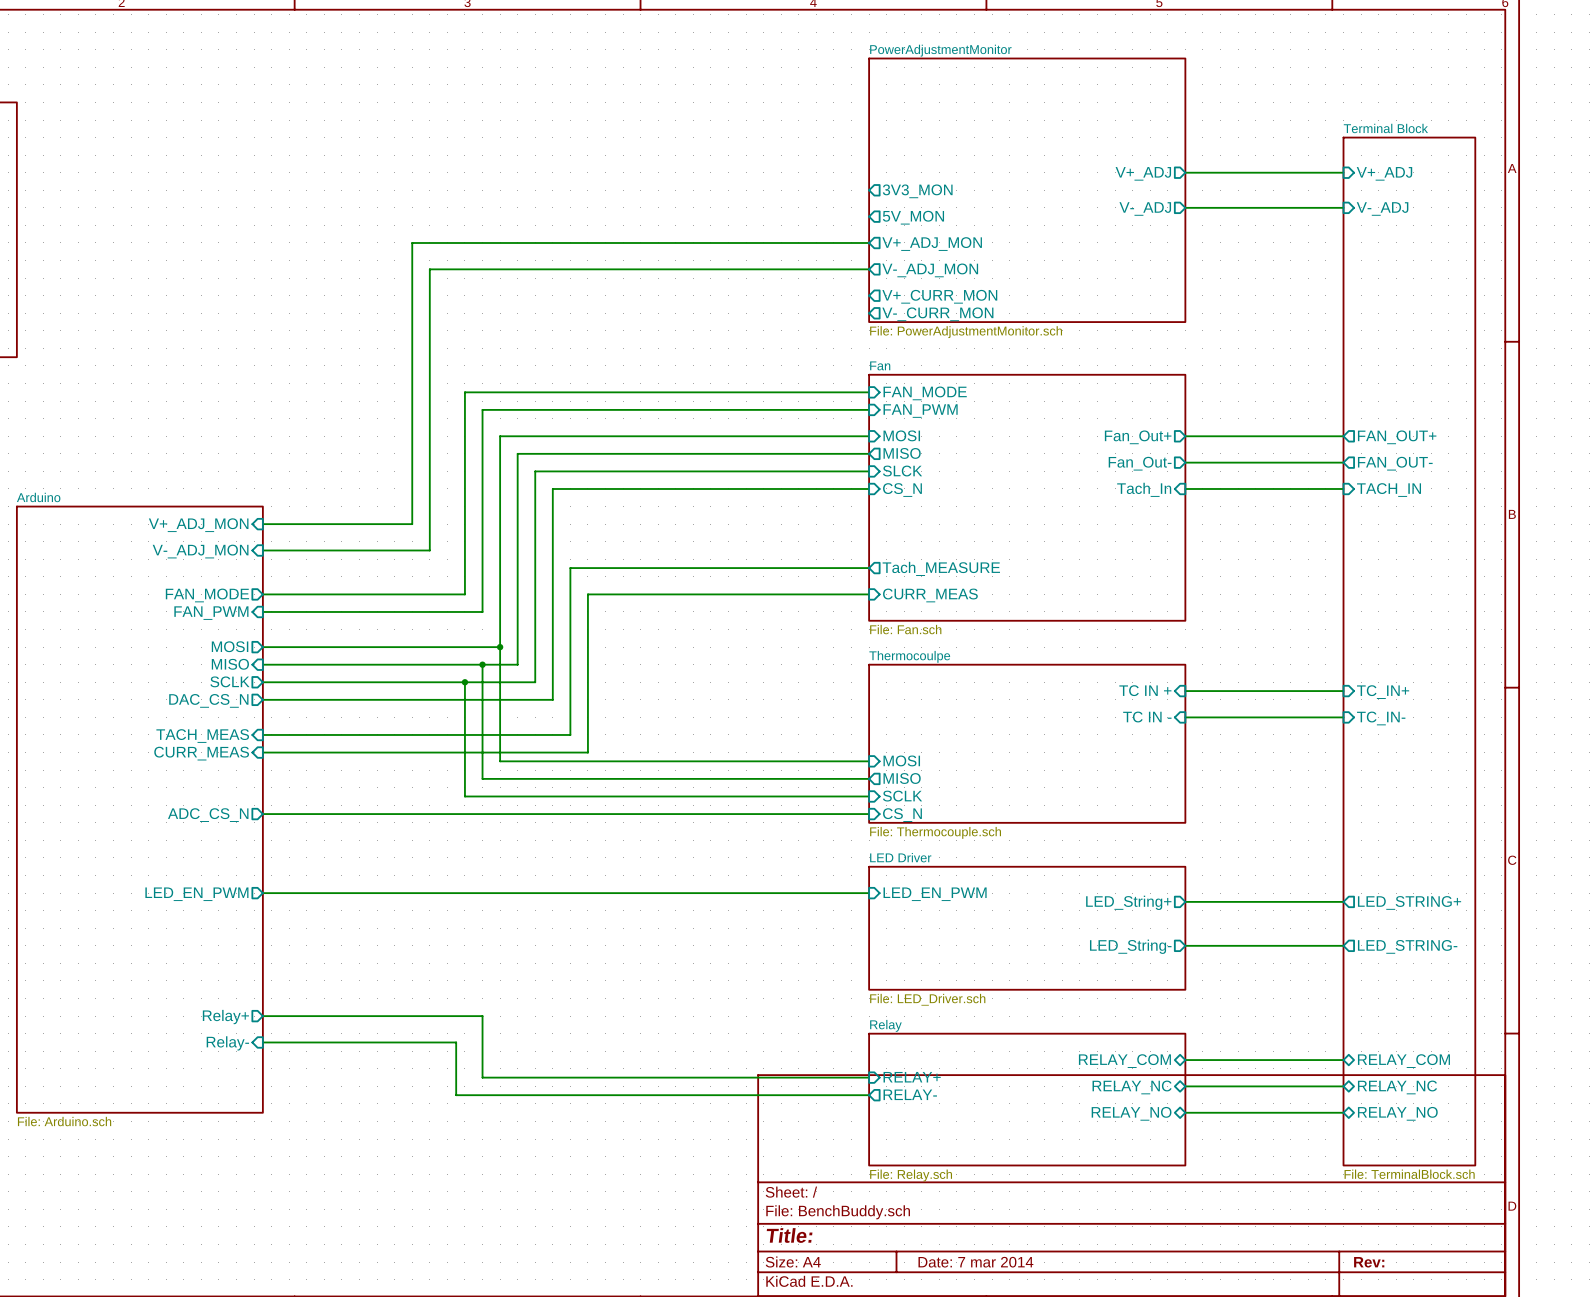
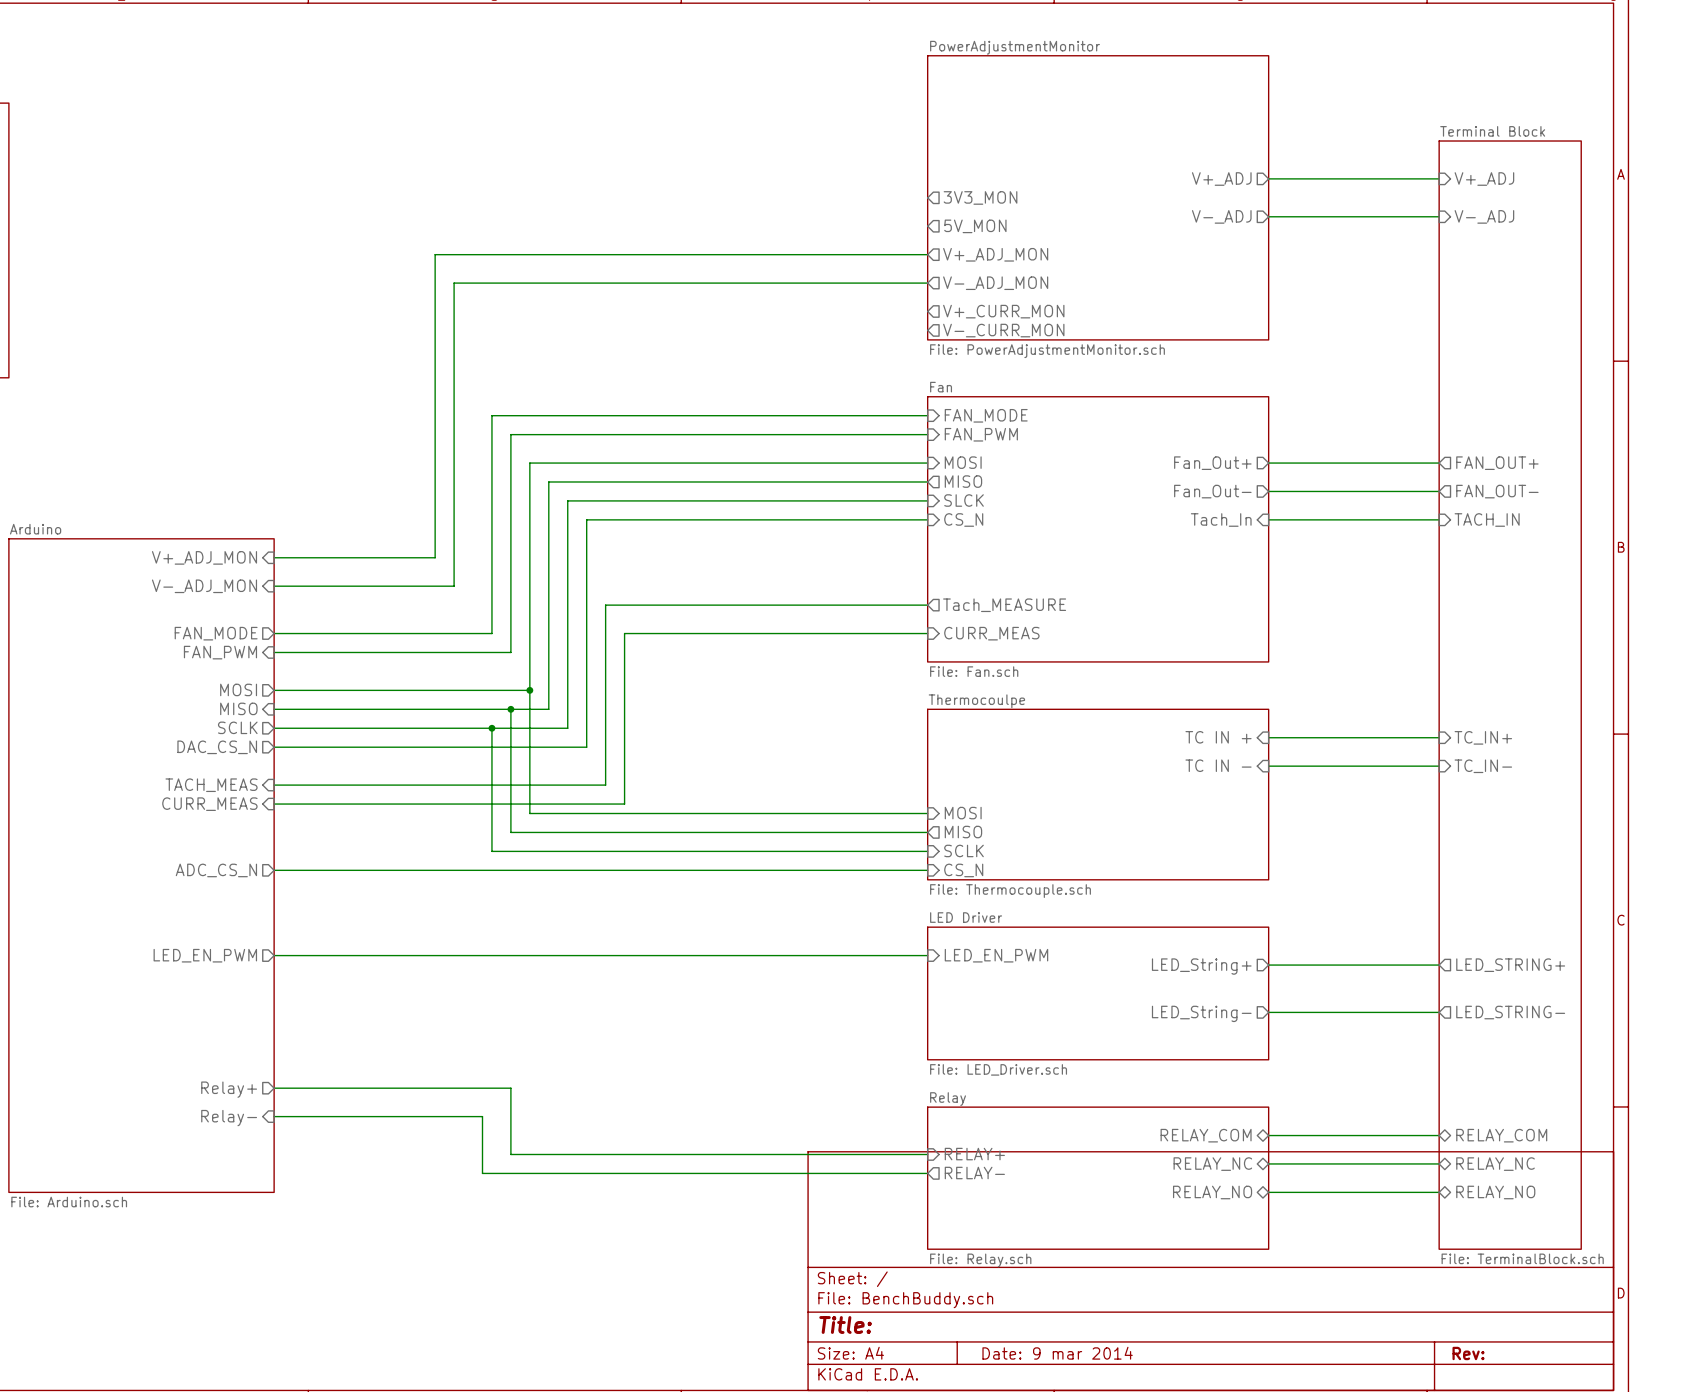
title block: Date: 7 mar 2014 (975, 1262) -> Date: 9 mar 2014 (1057, 1353)

